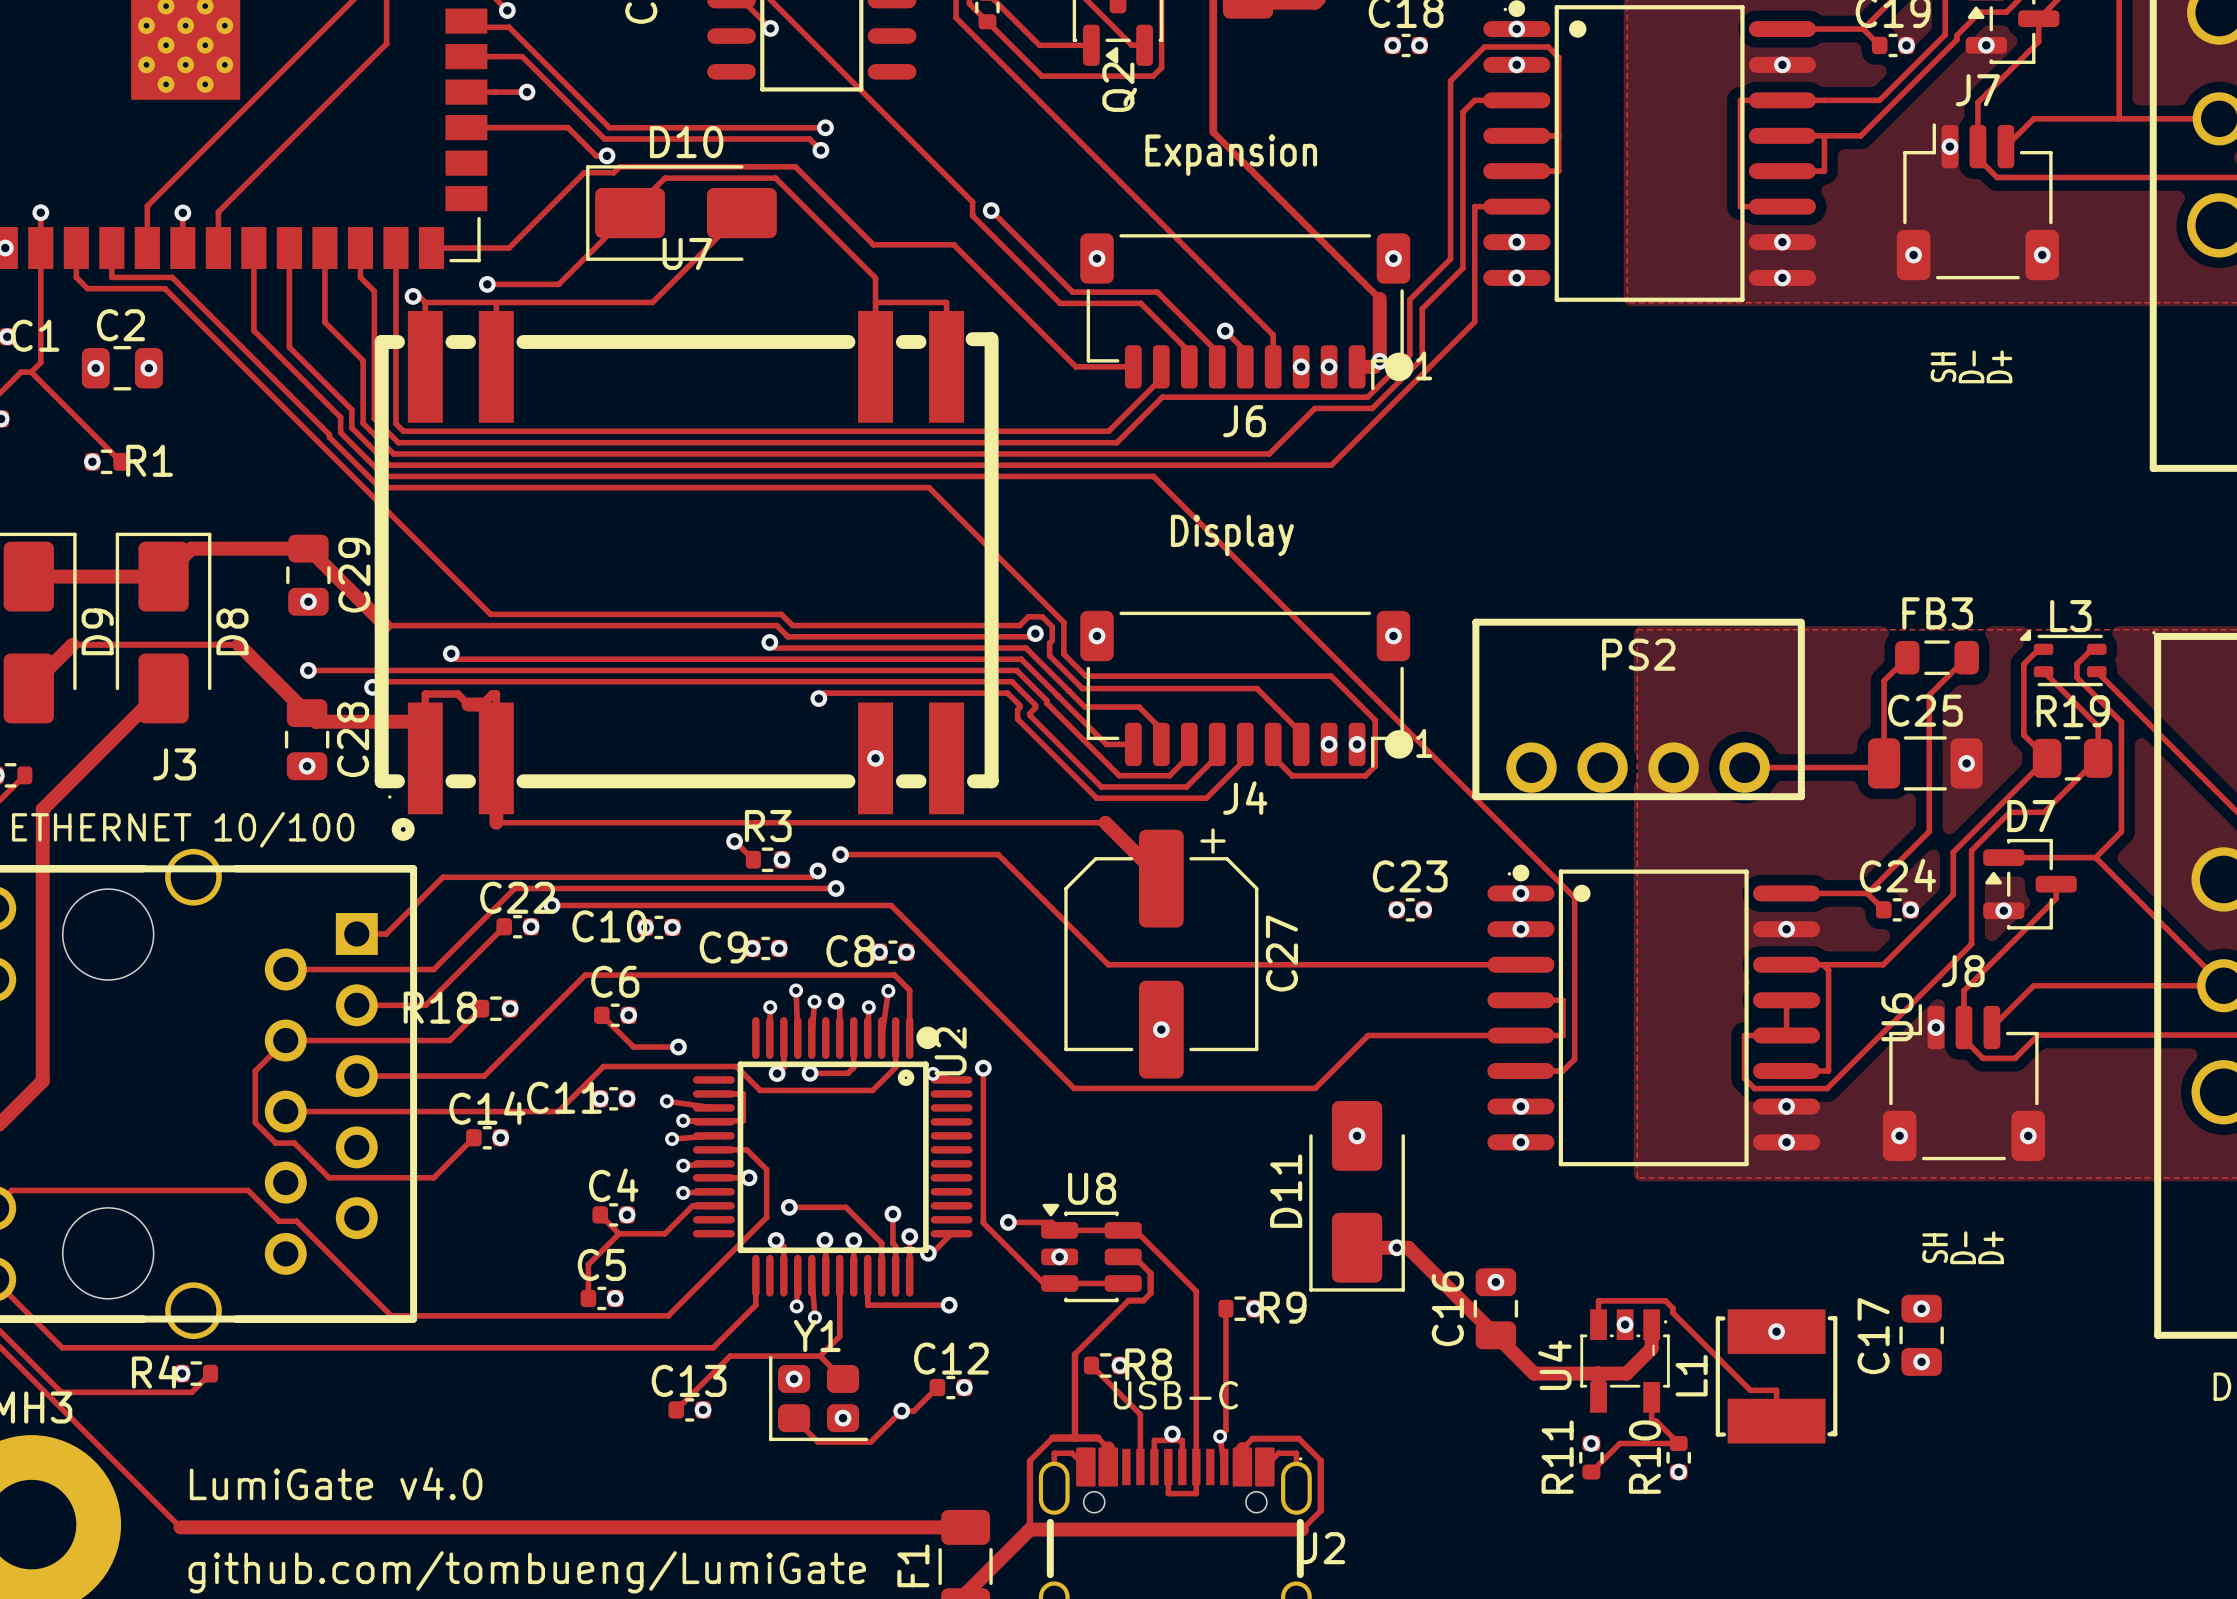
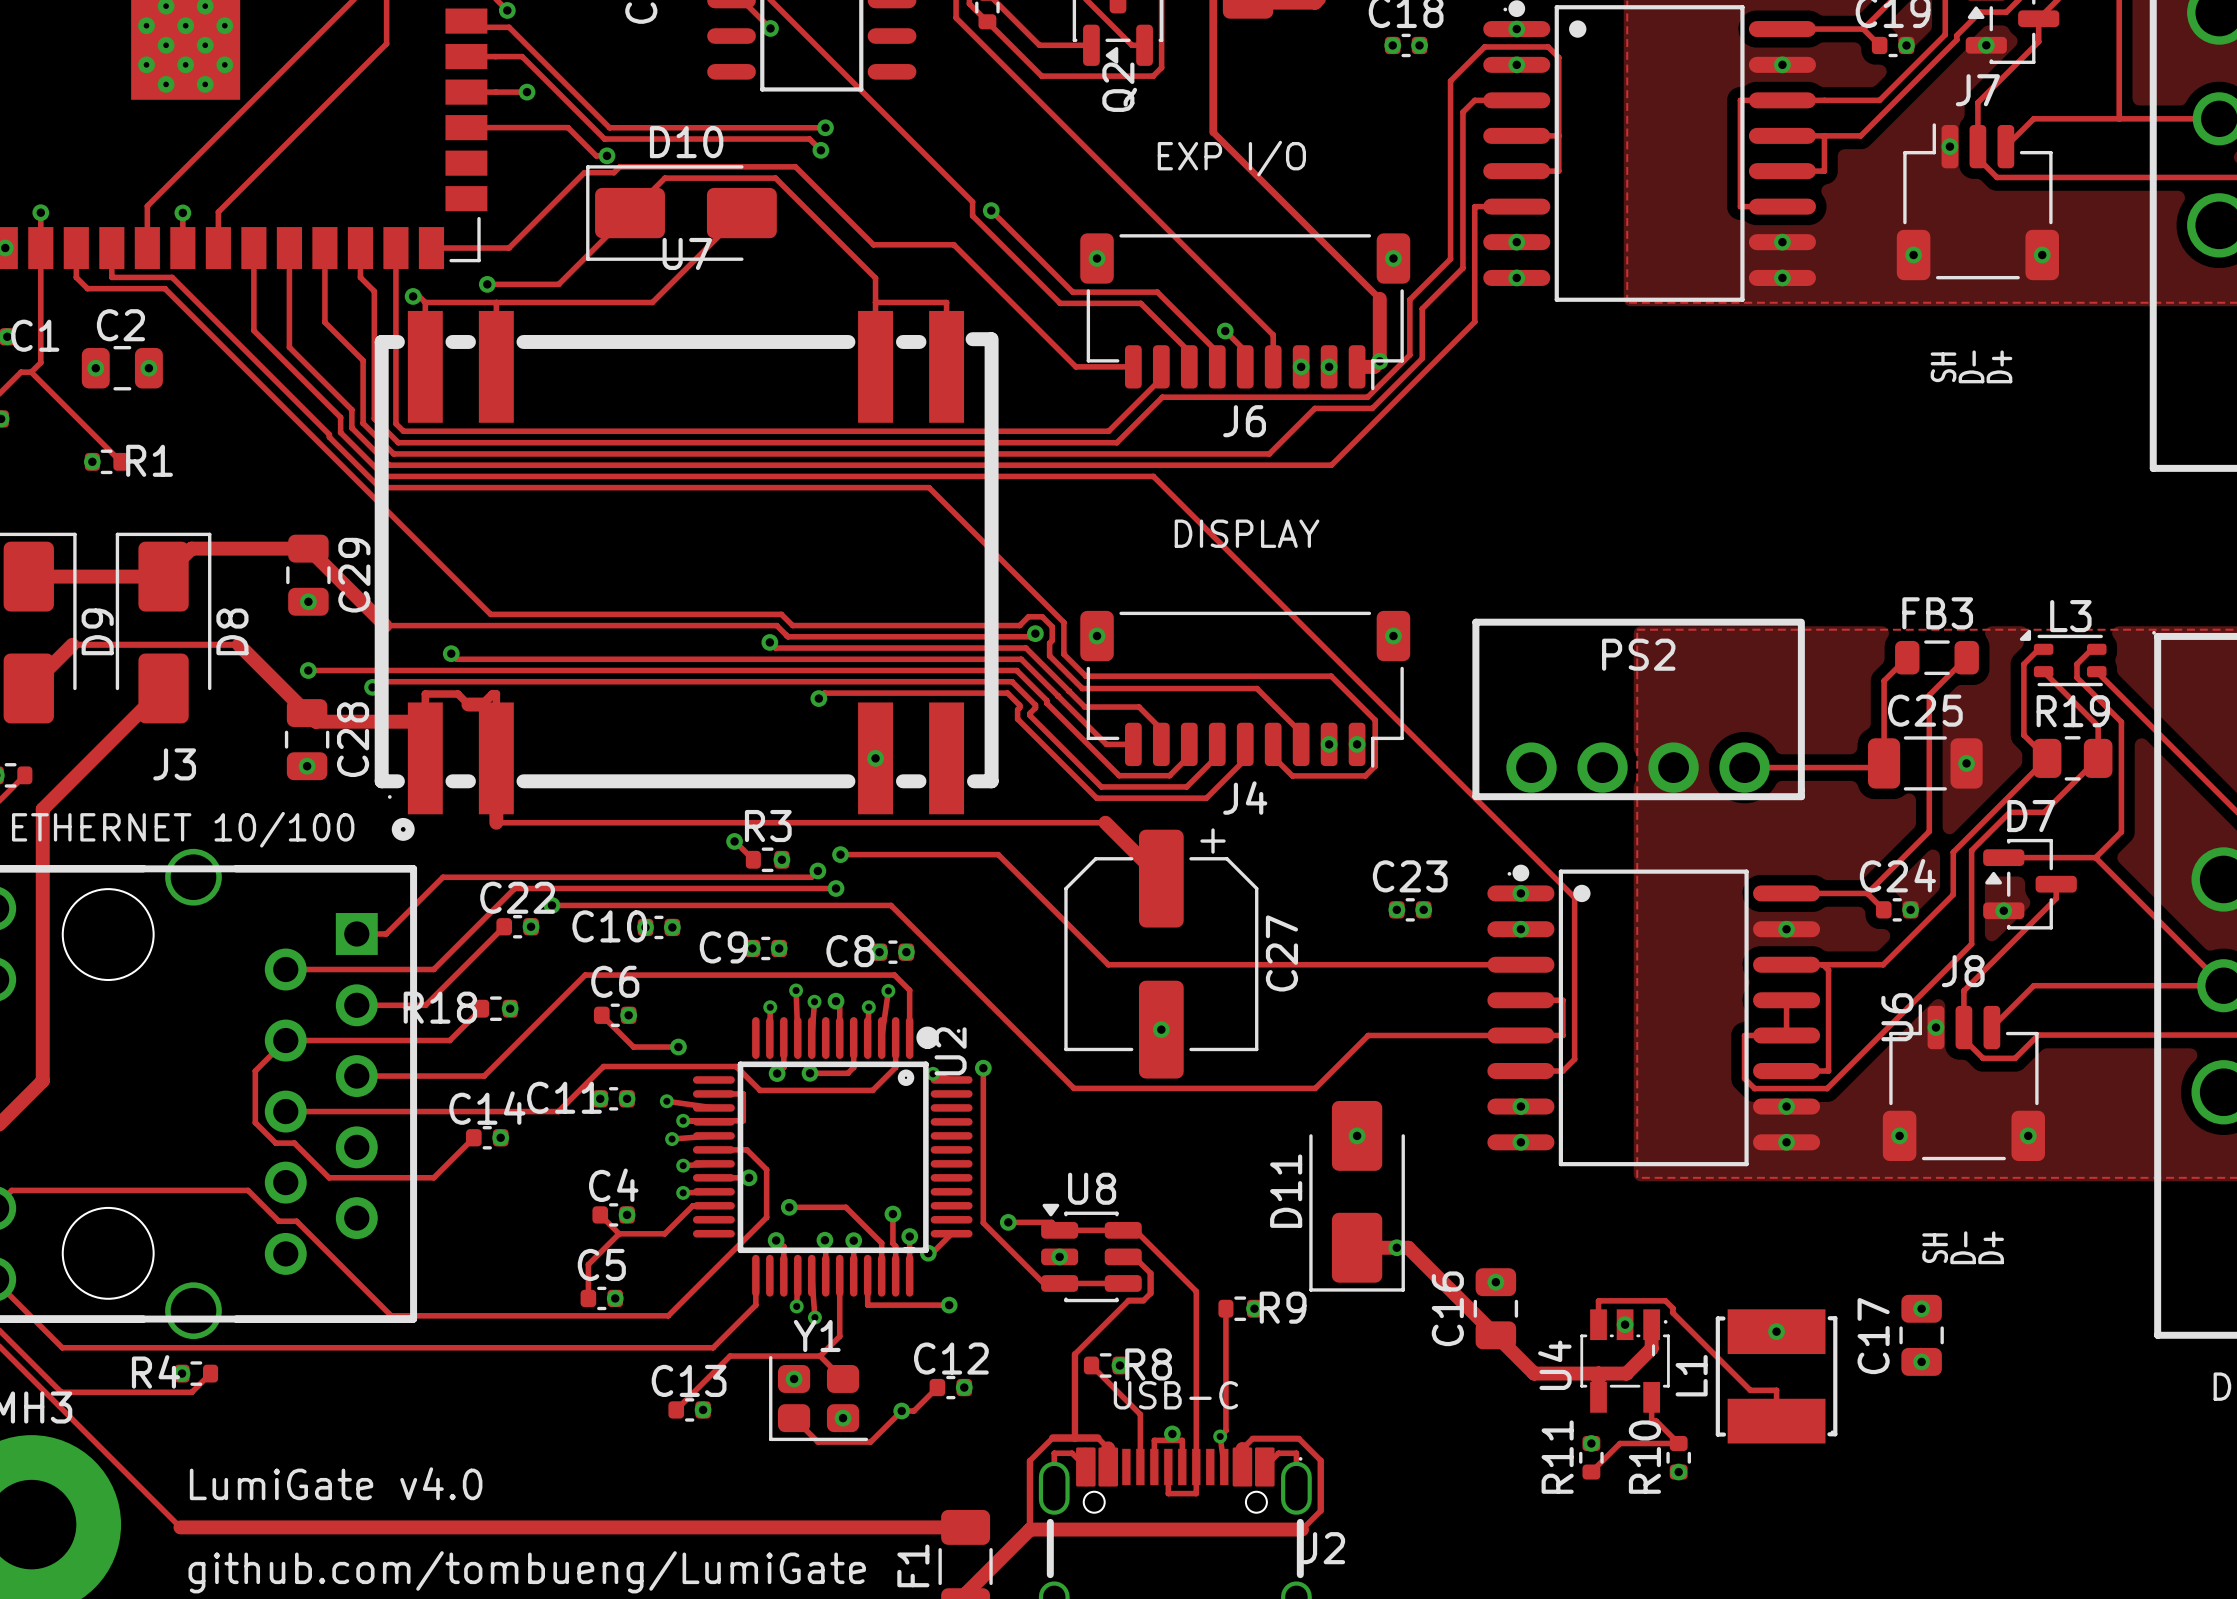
text: Expansion (1231, 155) -> EXP I/O (1231, 158)
drawing: [1384, 352, 1414, 382] -> none
text: 1 (1424, 365) -> none
text: Display (1232, 535) -> DISPLAY (1247, 533)
drawing: [1384, 730, 1414, 759] -> none
text: 1 (1424, 743) -> none

